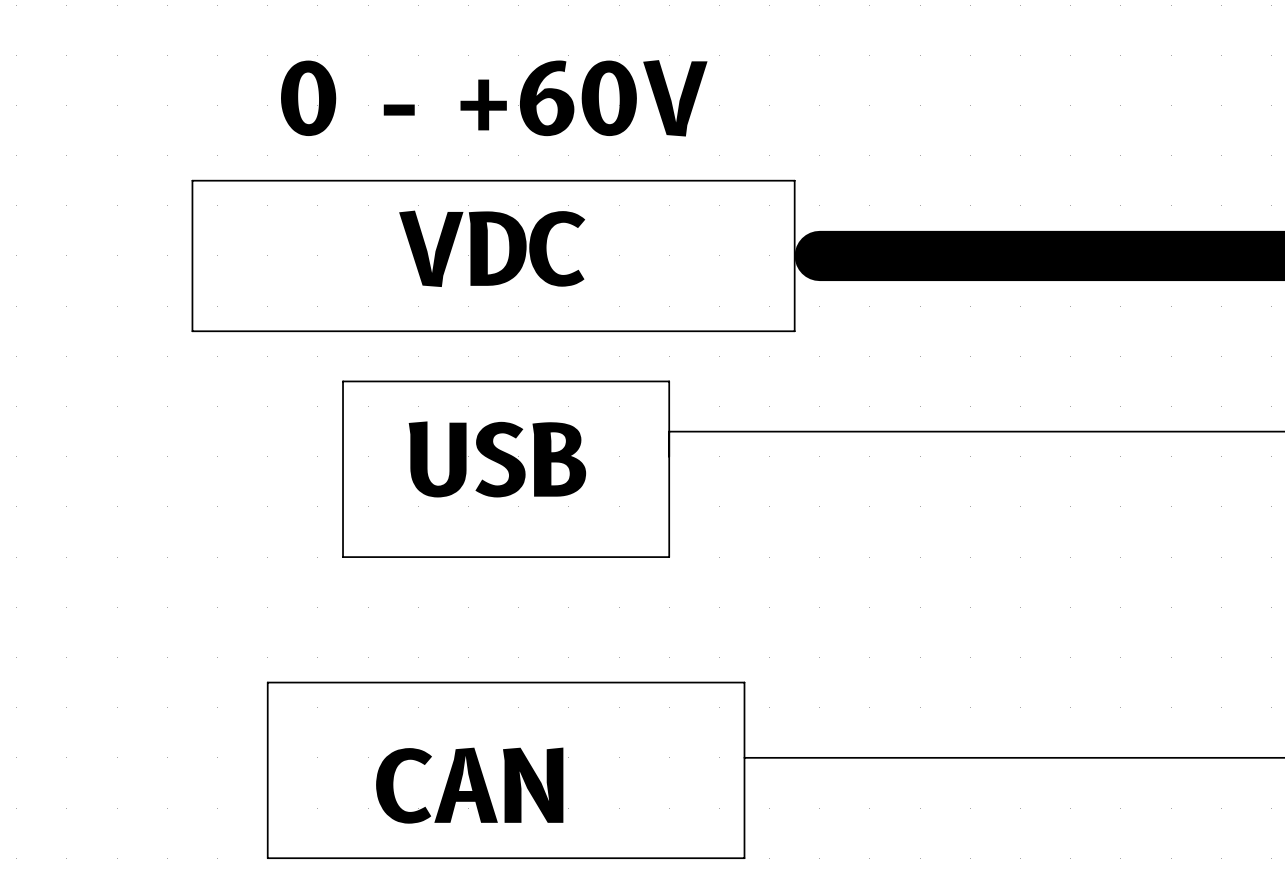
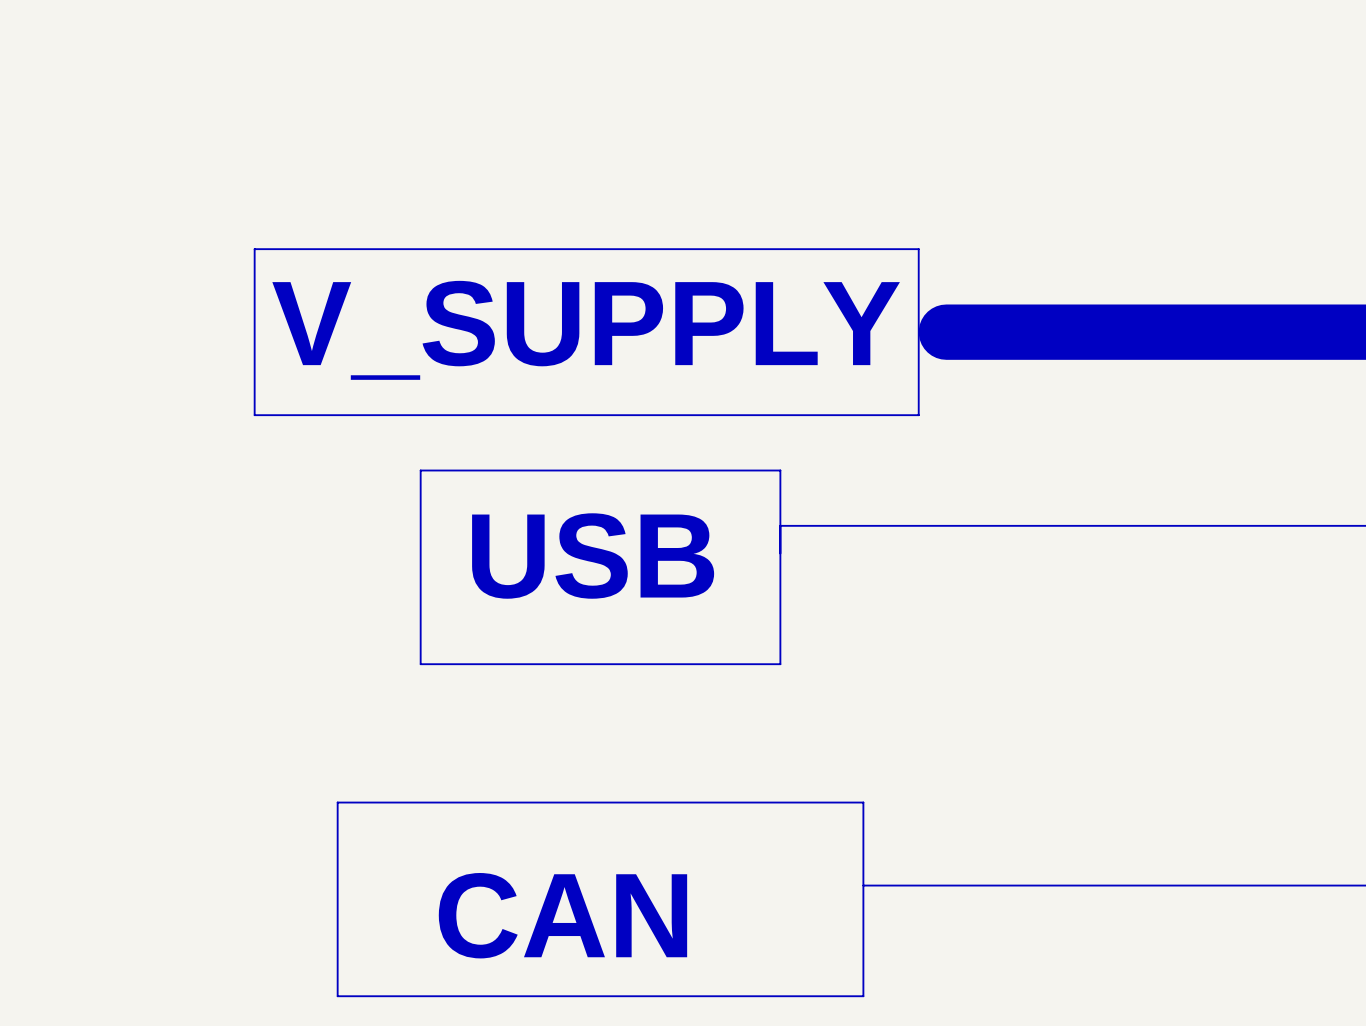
text: 0 - +60V (494, 98) -> none
text: VDC (492, 248) -> V_SUPPLY (586, 330)

